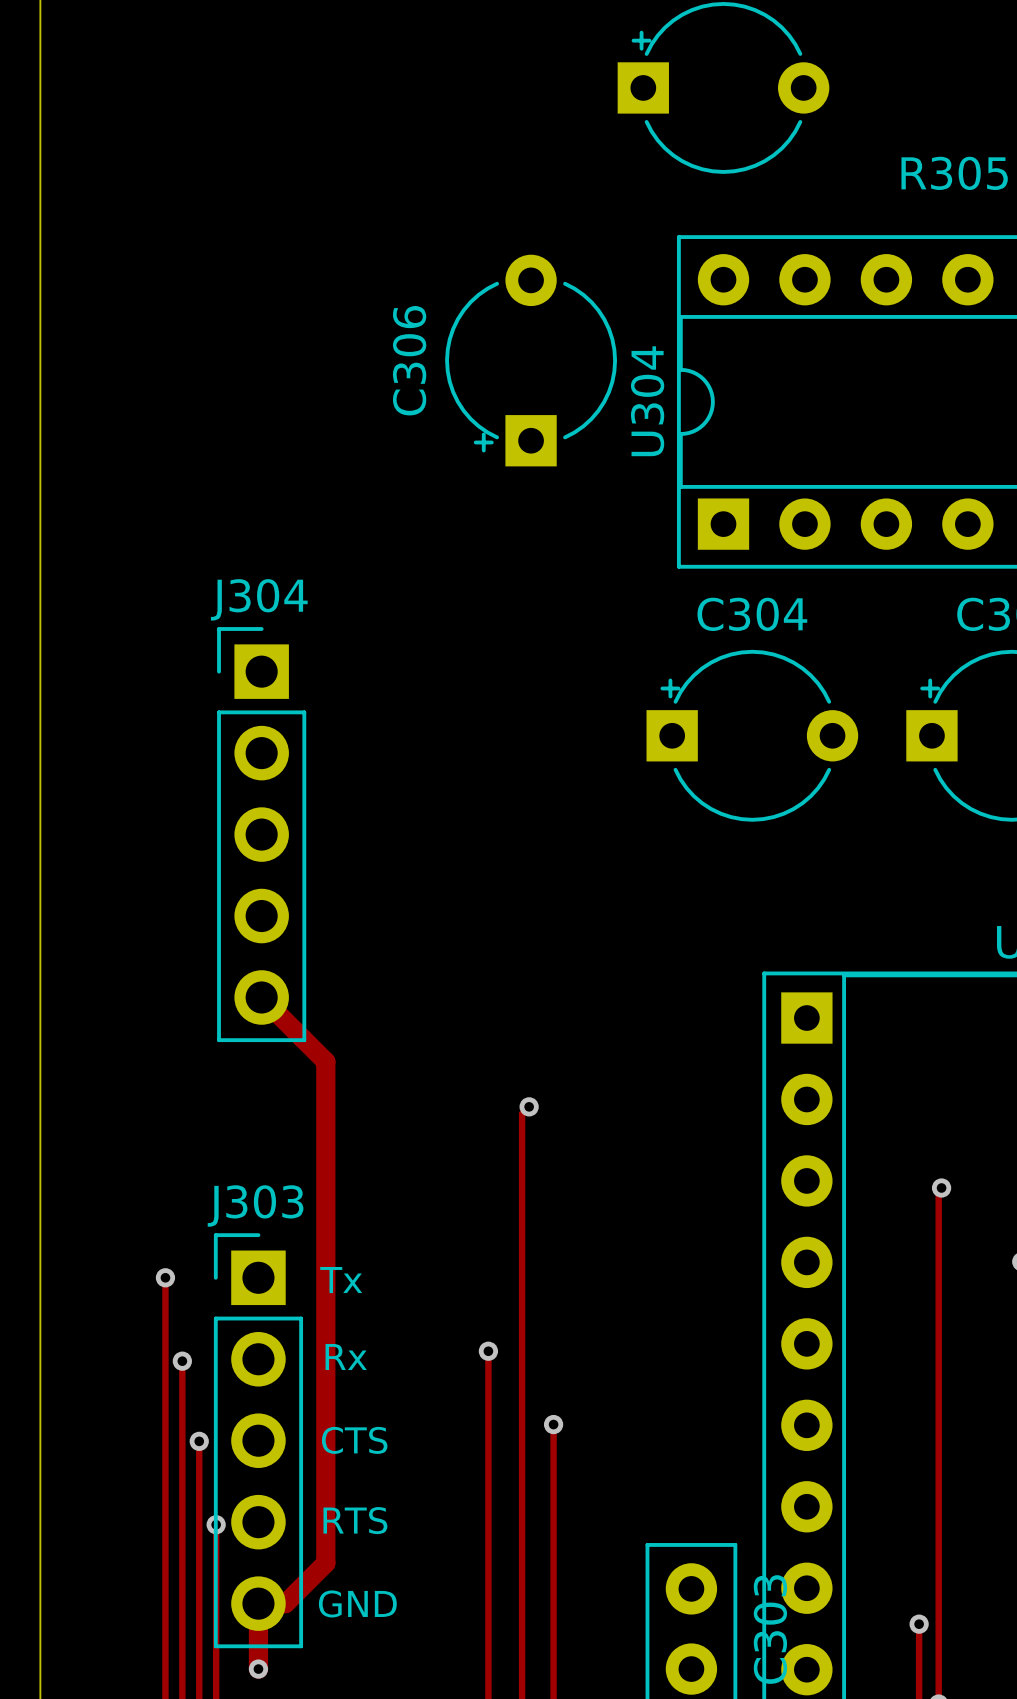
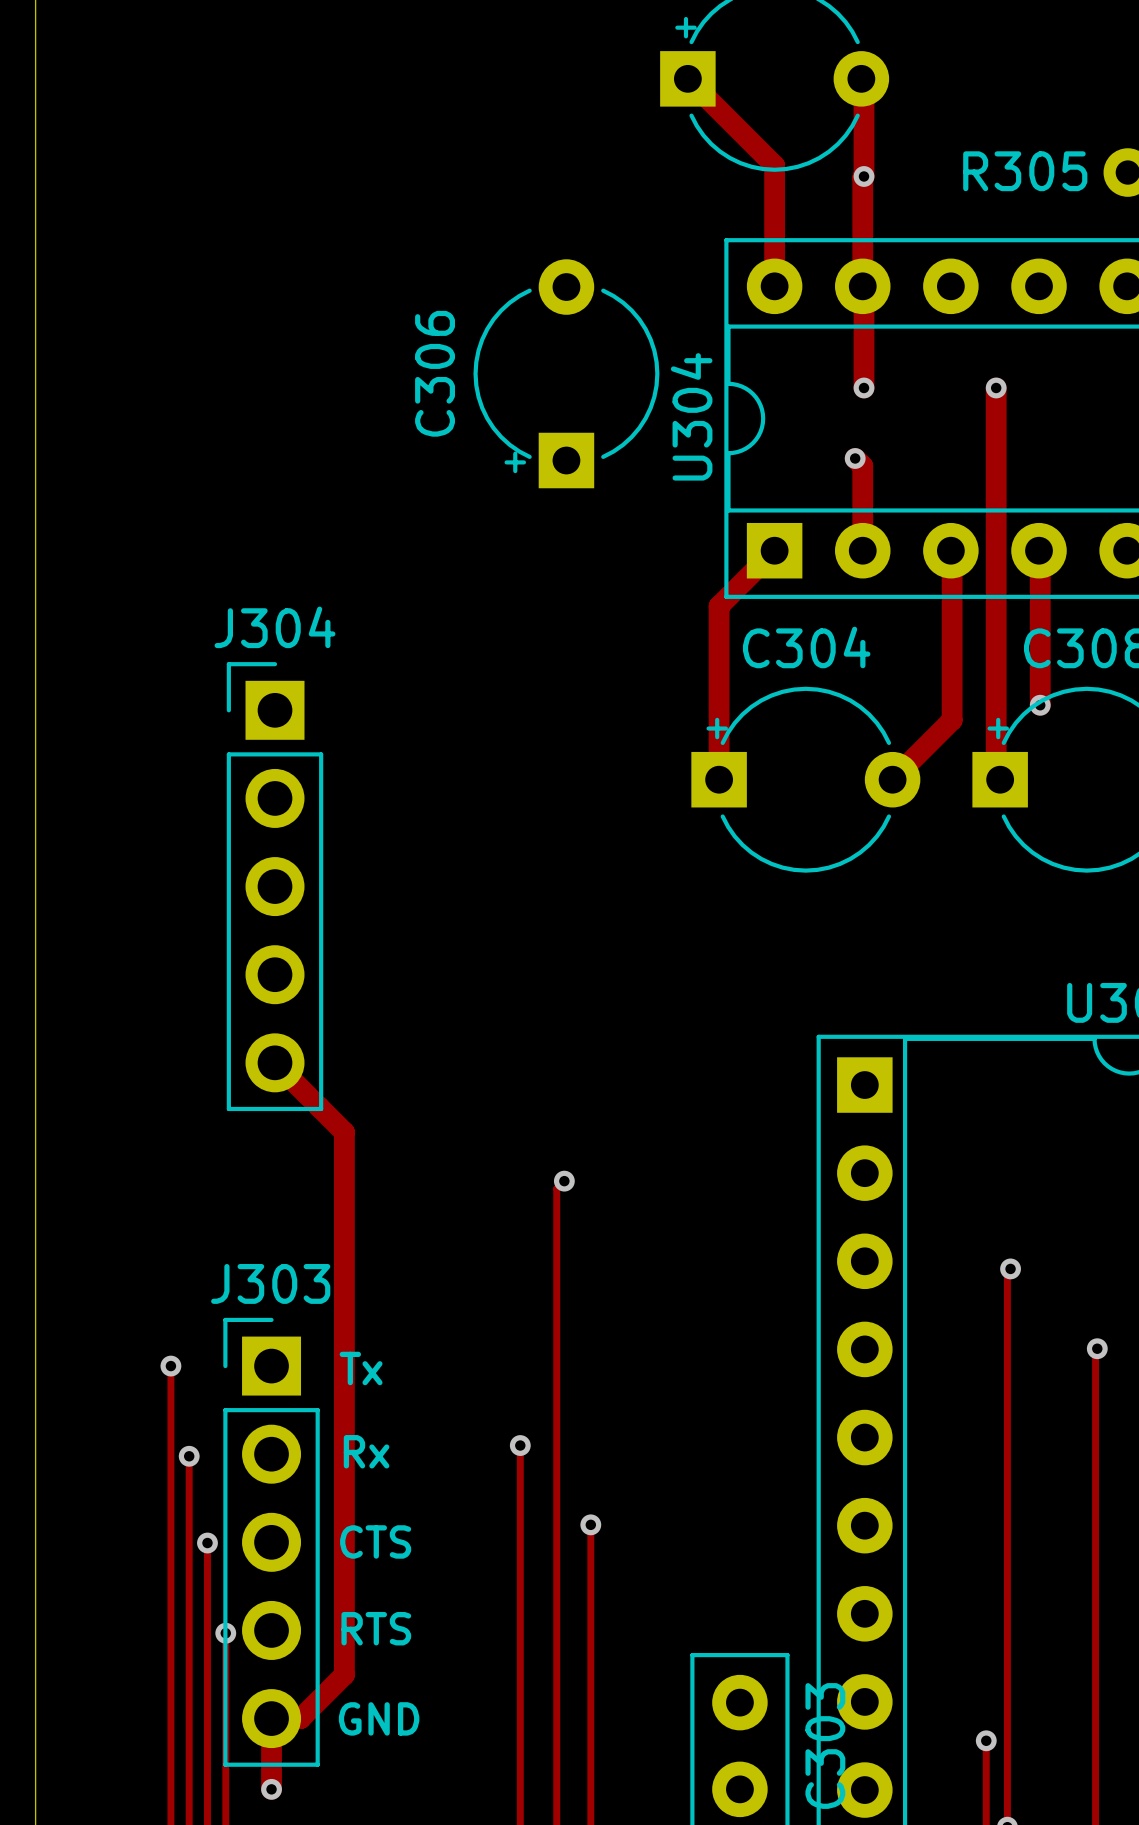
track: none -> (687, 78) (774, 165) (774, 286)
track: none -> (861, 78) (864, 81) (864, 387)
via: none -> (864, 176)
via: none -> (864, 387)
track: none -> (996, 387) (996, 775) (1000, 779)
via: none -> (996, 387)
track: none -> (855, 458) (862, 466) (862, 550)
via: none -> (855, 458)
track: none -> (774, 550) (719, 606) (719, 779)
track: none -> (950, 550) (952, 720) (892, 779)
track: none -> (1039, 550) (1040, 705)
via: none -> (1040, 705)

